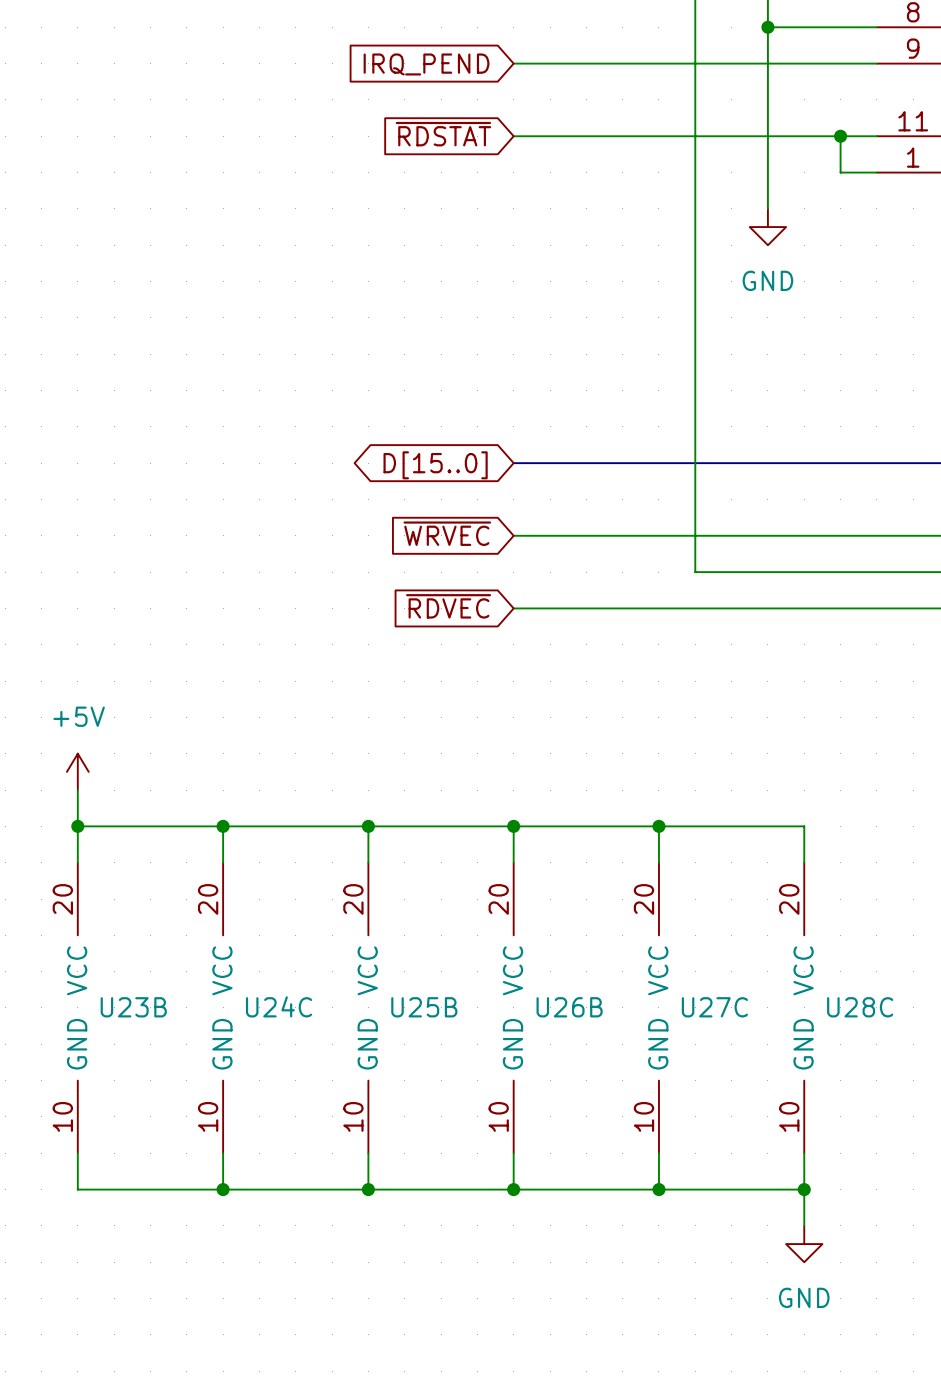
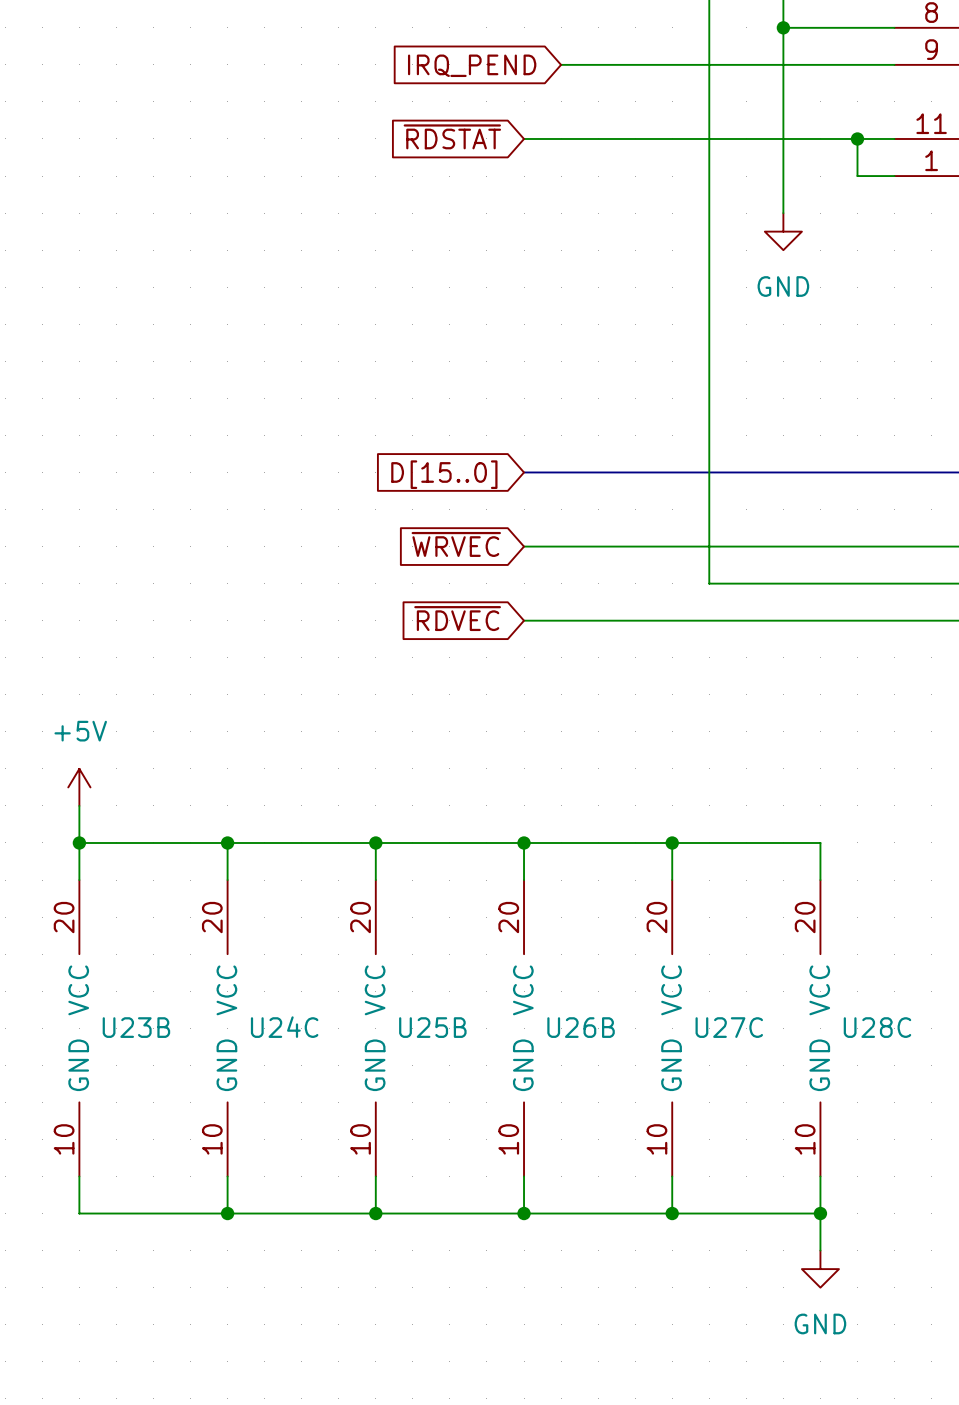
wire: (513, 63) (550, 63) -> none
global label position: IRQ_PEND (426, 64) -> IRQ_PEND (472, 65)
global label shape: bidirectional (435, 465) -> input (444, 474)

